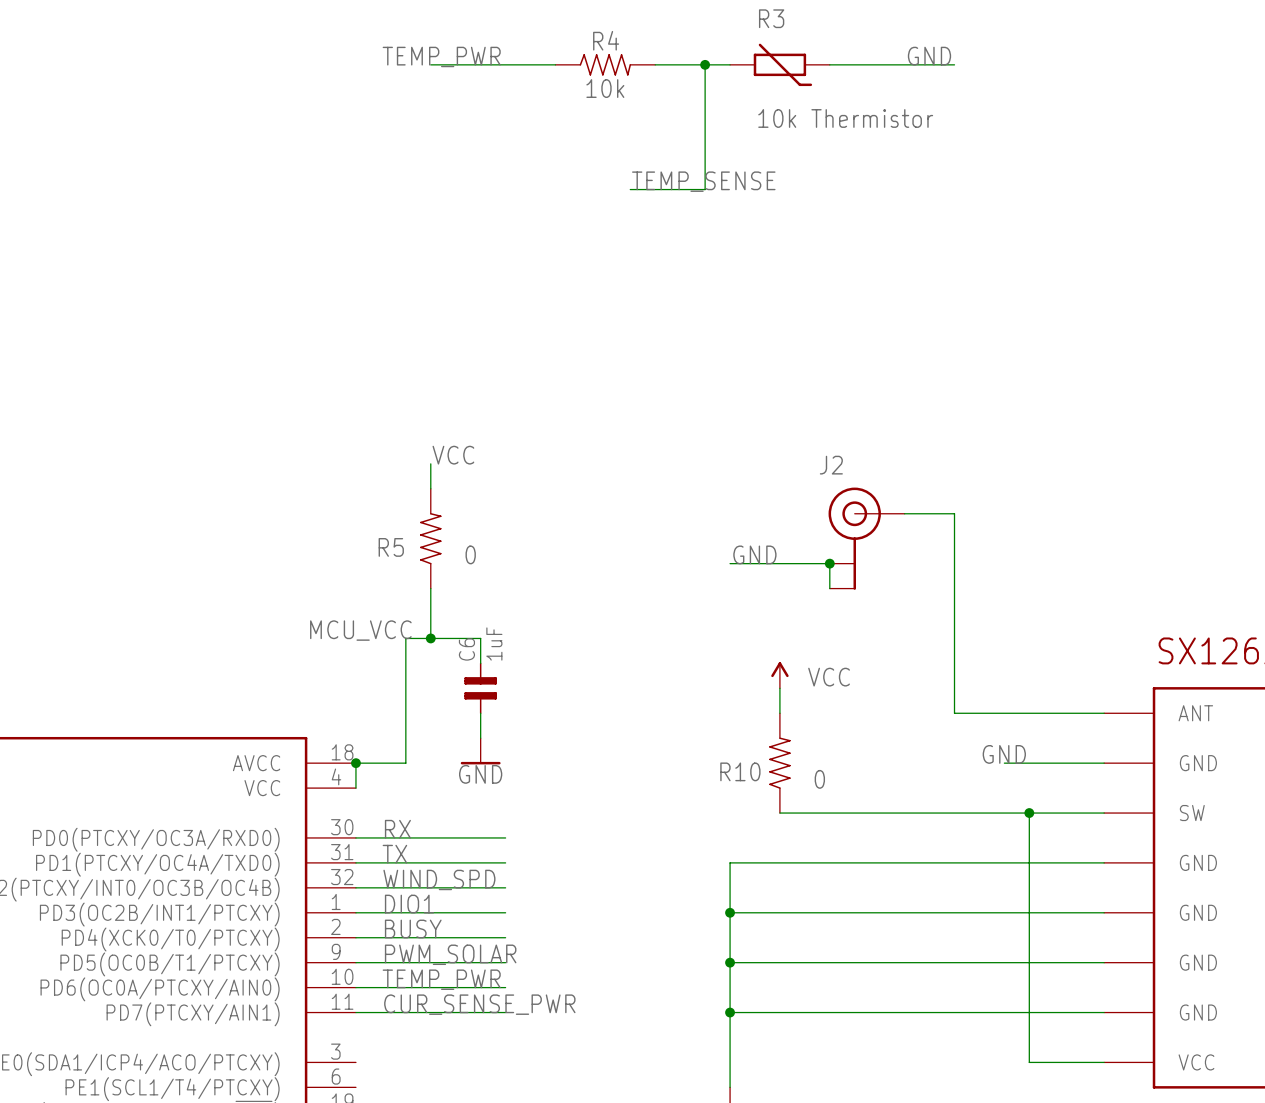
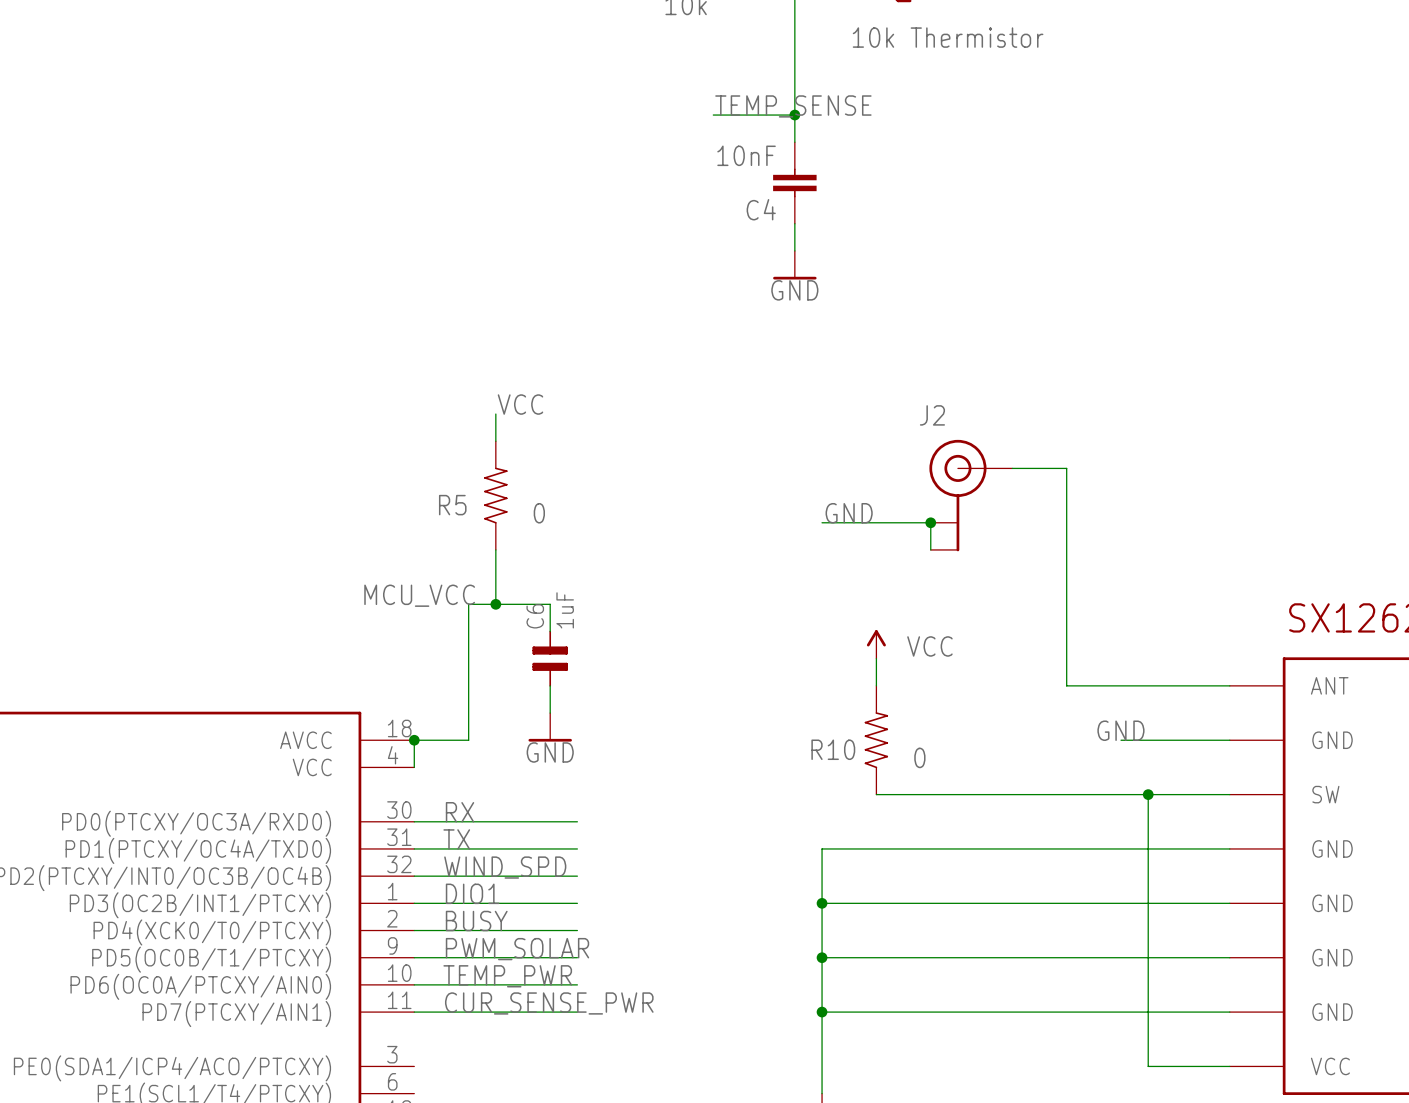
wire: none -> (794, 115) (794, 142)
junction: none -> (794, 115)
C4: none -> 10nF (794, 182)
wire: none -> (794, 223) (794, 250)
power symbol: none -> GND (794, 265)

